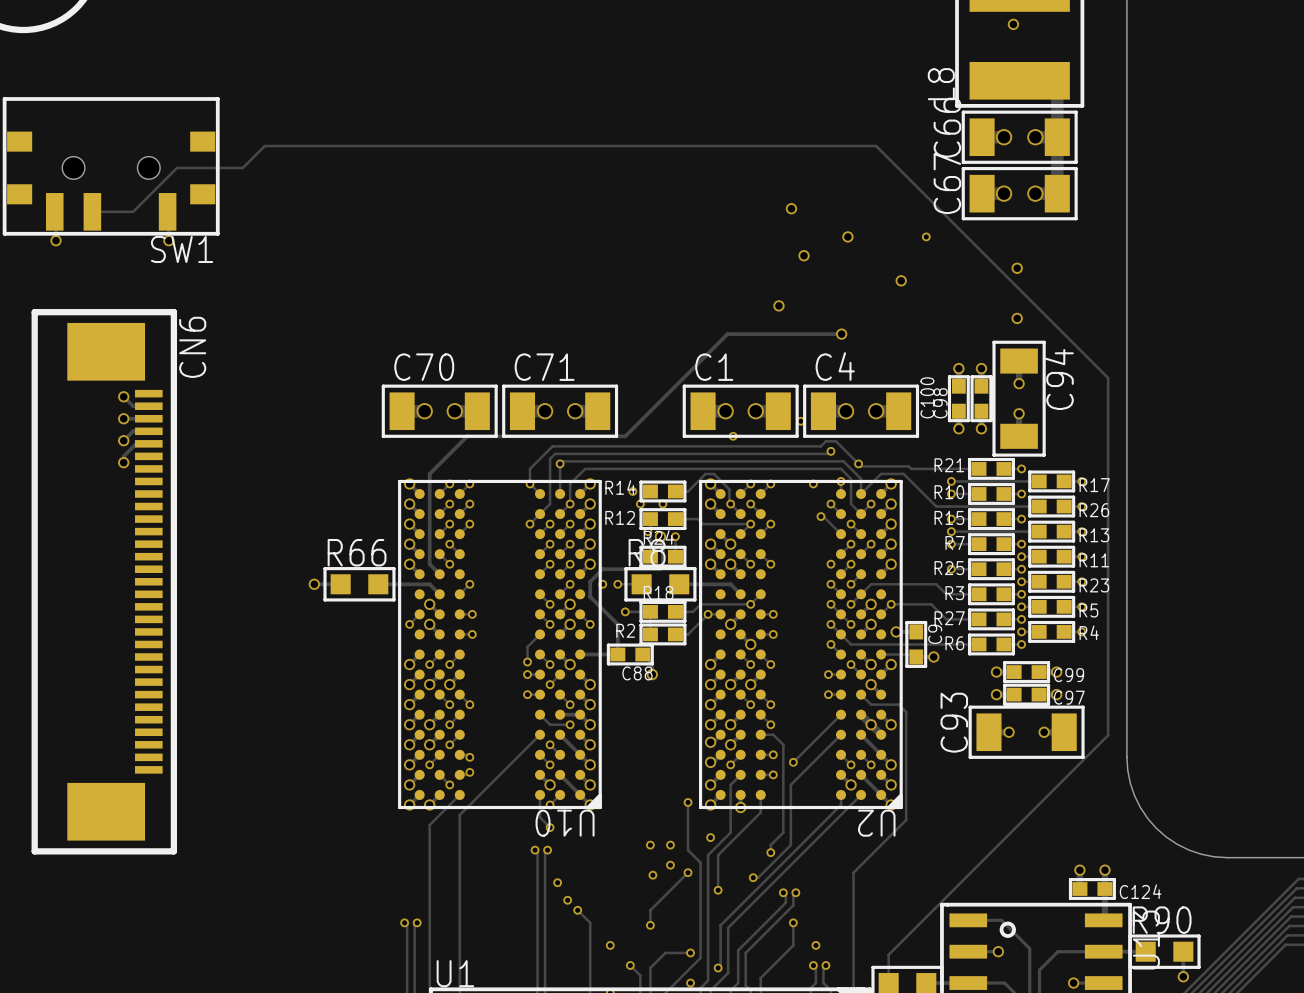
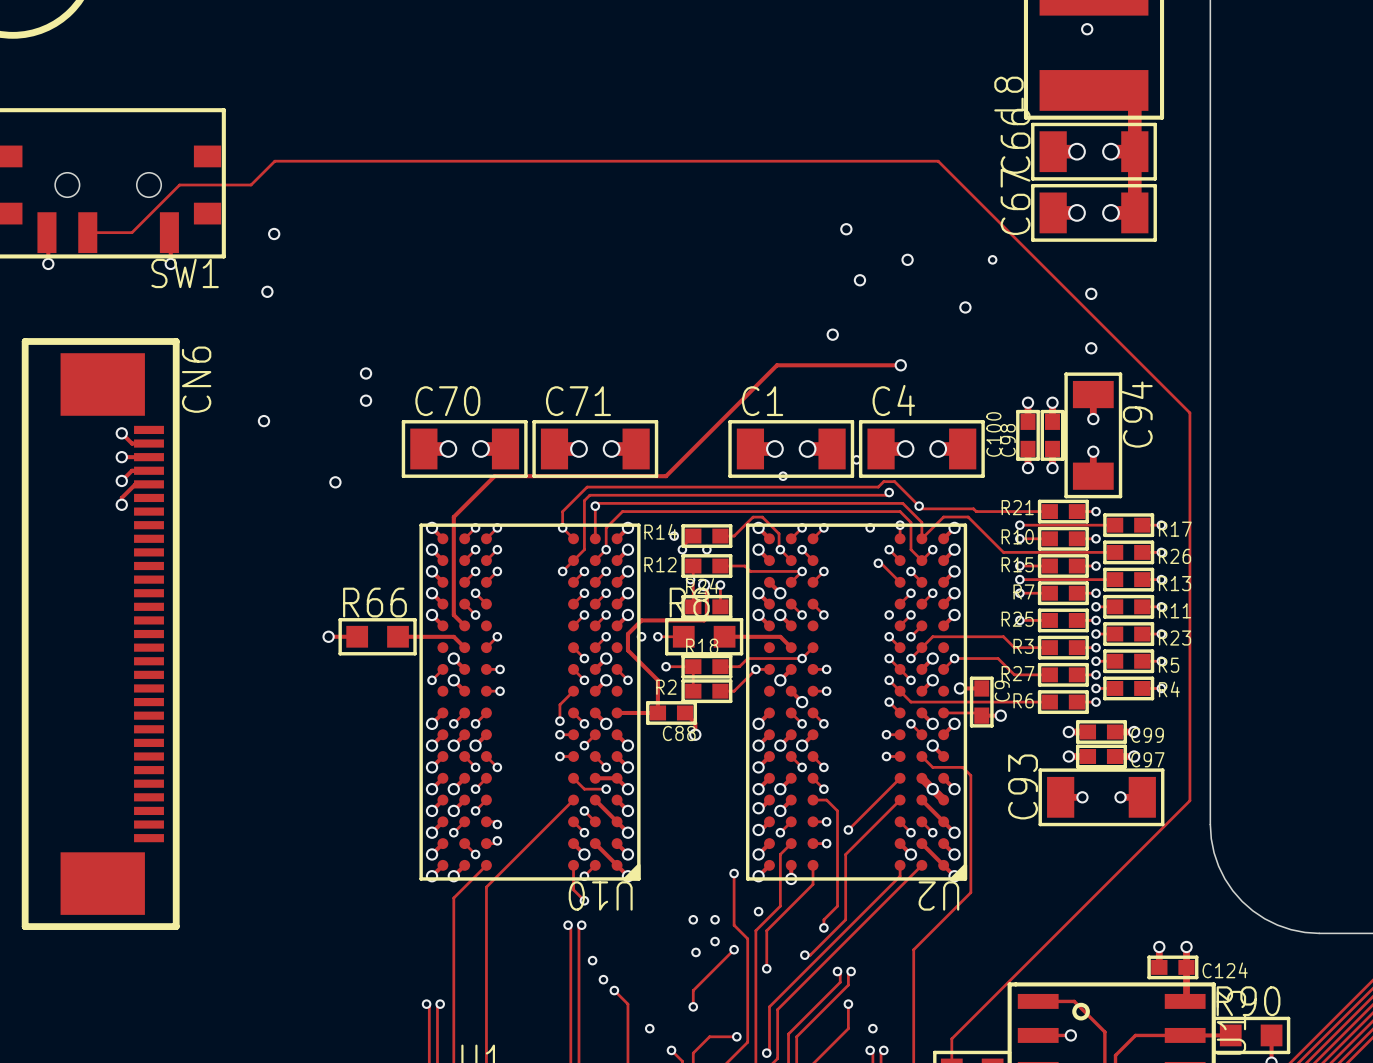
via: none -> (274, 233)
via: none -> (267, 291)
via: none -> (366, 373)
via: none -> (366, 400)
via: none -> (263, 421)
via: none -> (335, 482)

